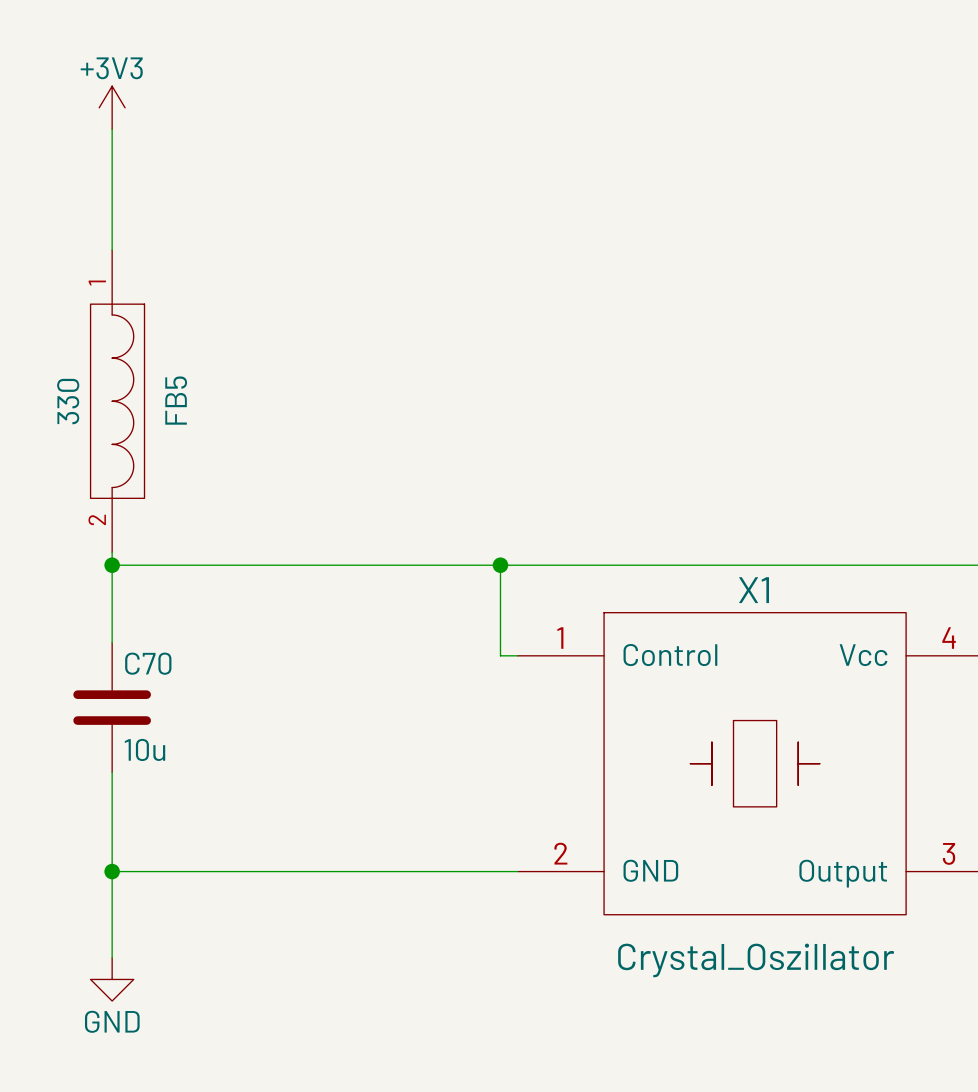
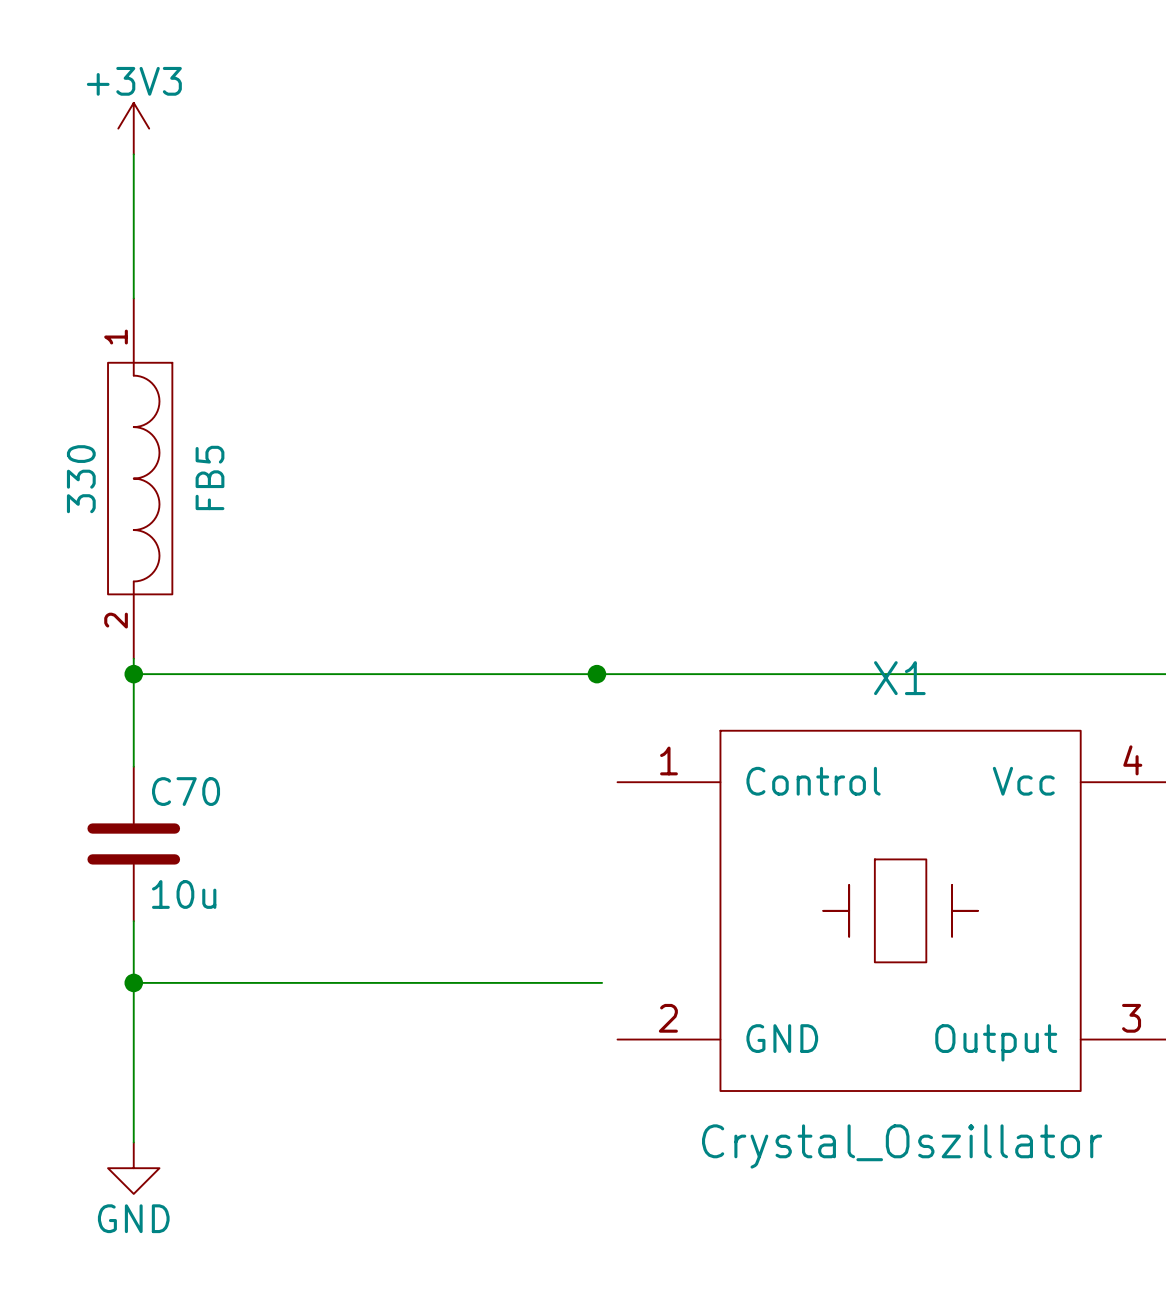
wire: (500, 565) (500, 655) (517, 655) -> none
X1 name position: X1 (754, 590) -> X1 (899, 678)
wire: none -> (133, 982) (602, 982)
wire: (112, 871) (517, 871) -> none
junction position: (112, 871) -> (133, 982)

